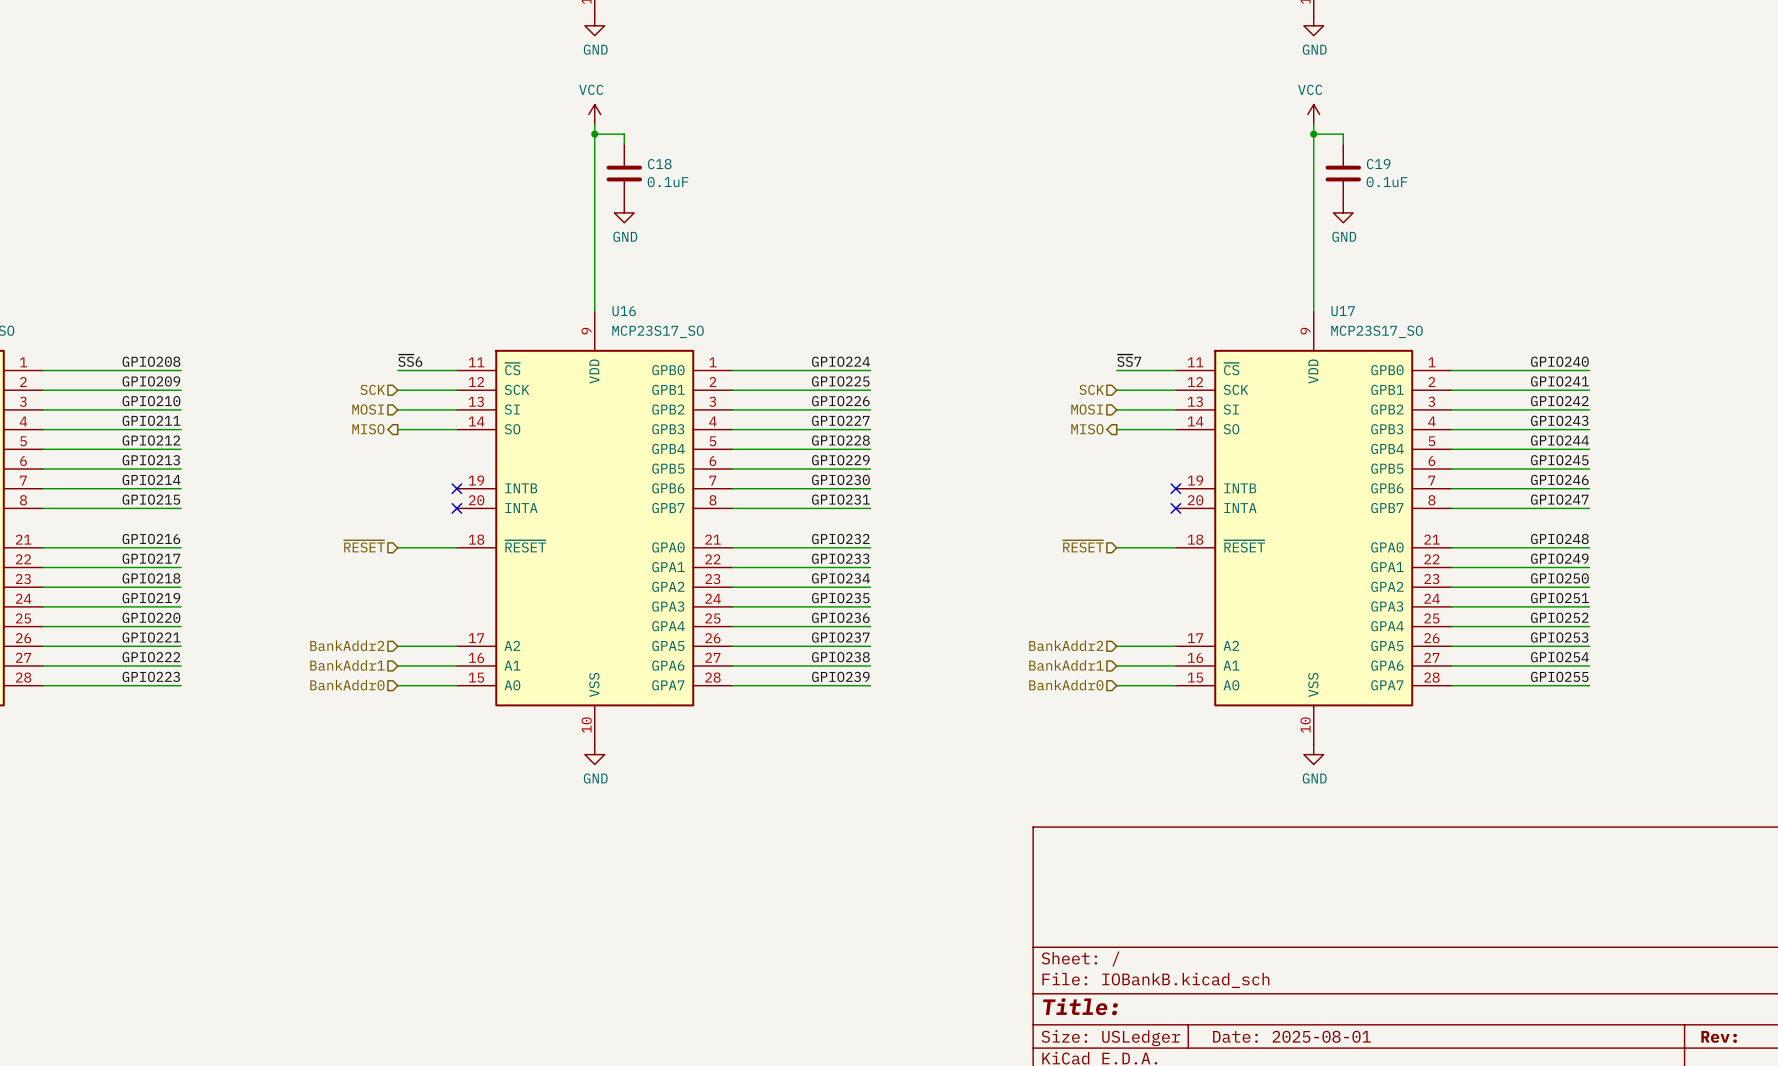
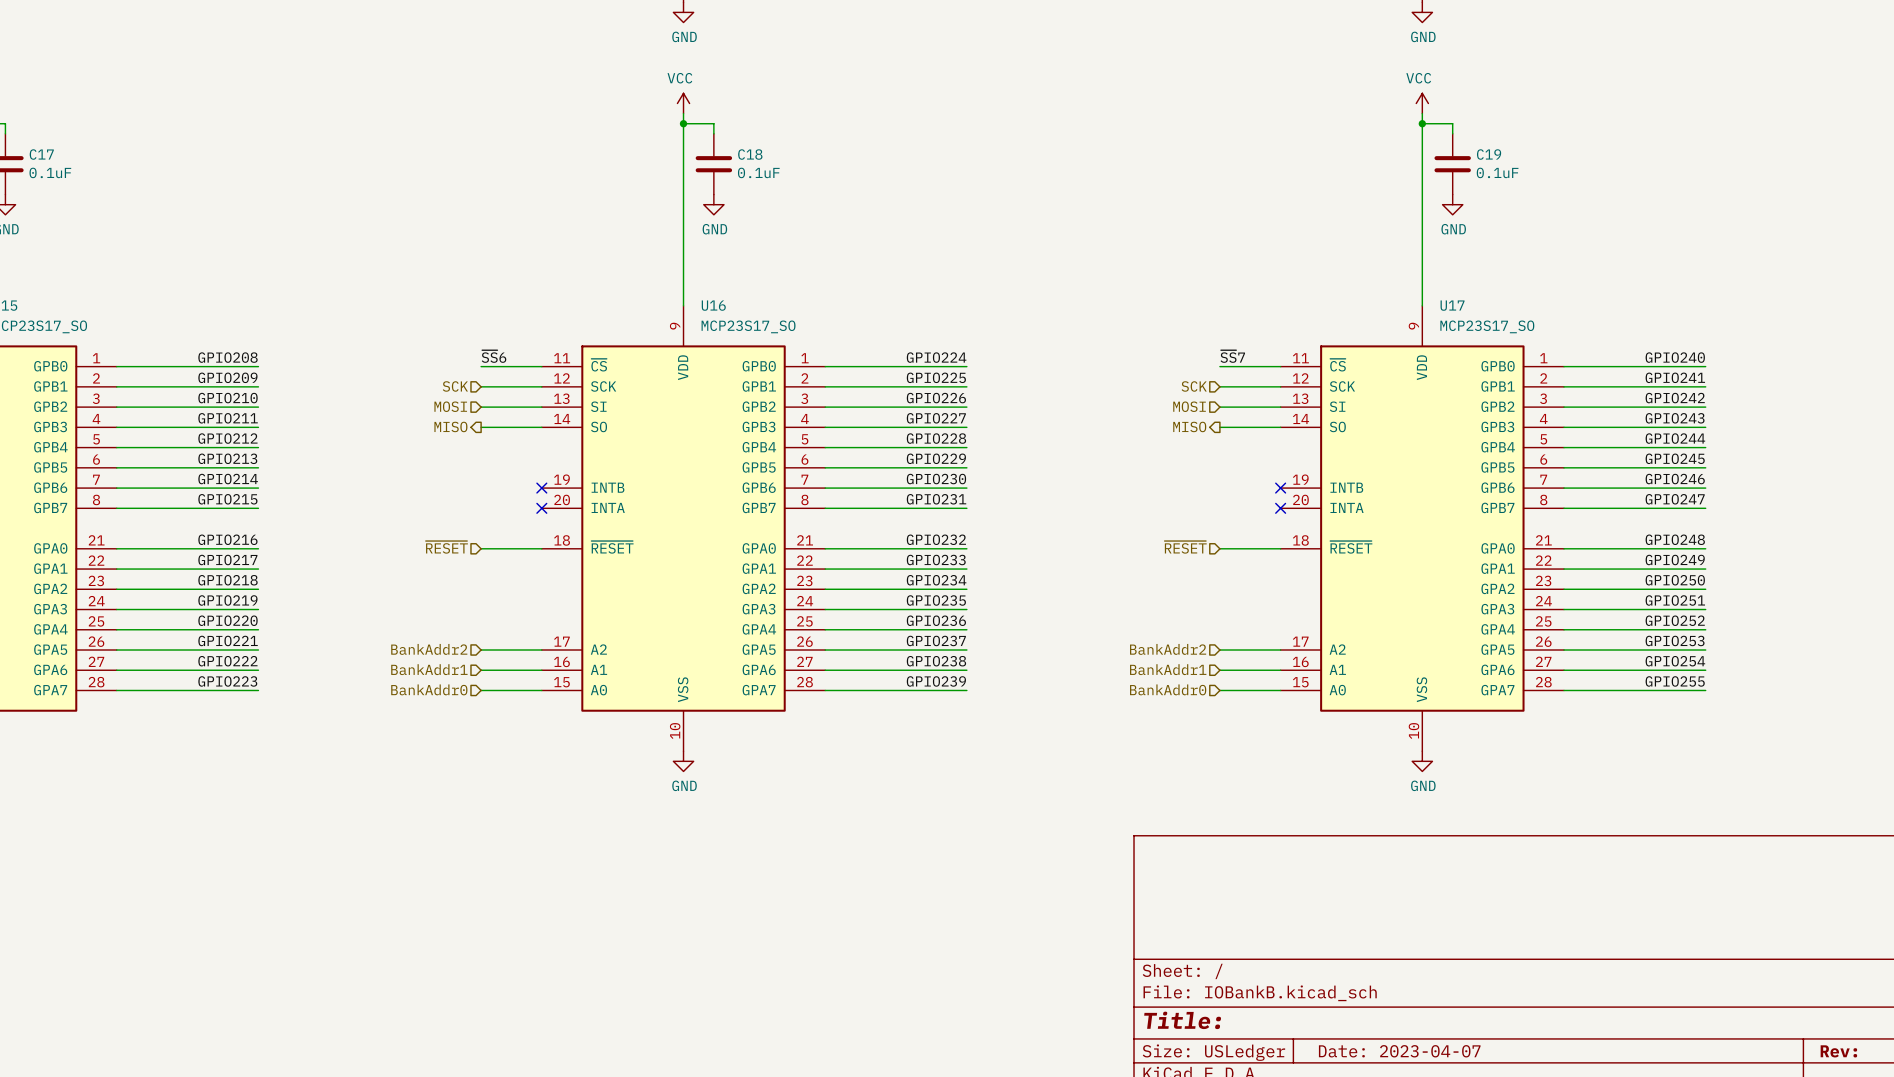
title block: Date: 2025-08-01 (1291, 1036) -> Date: 2023-04-07 (1399, 1051)

